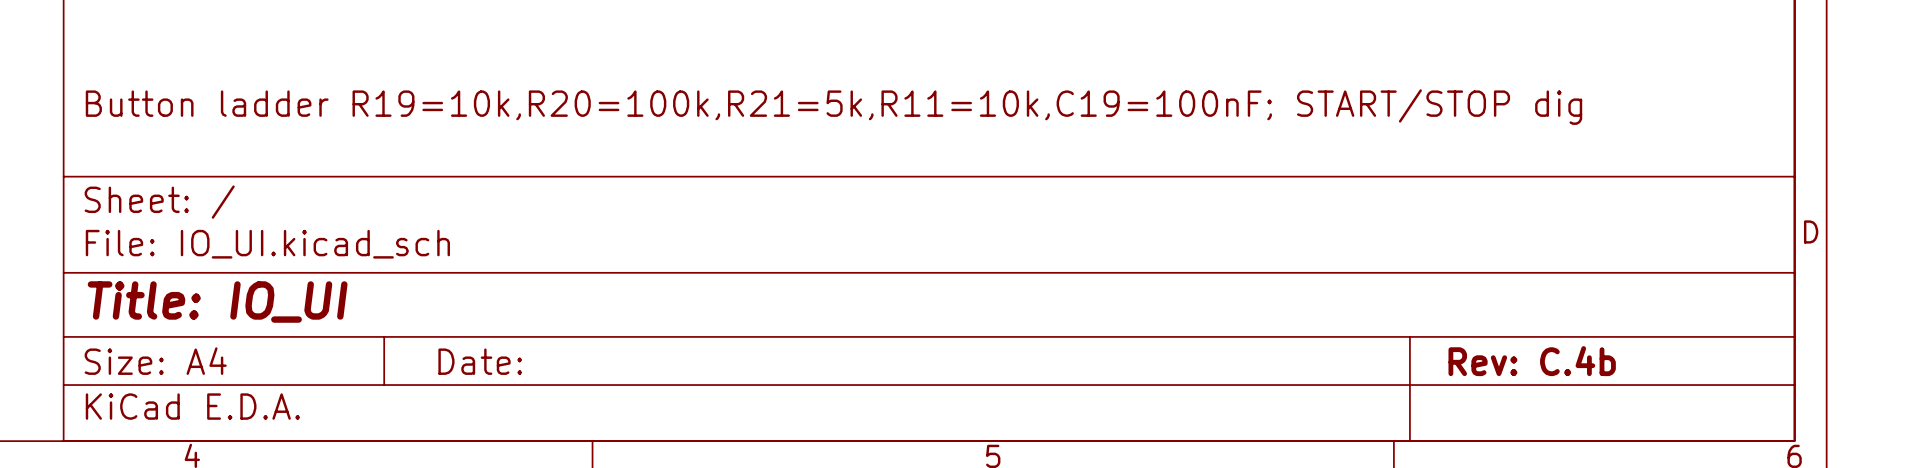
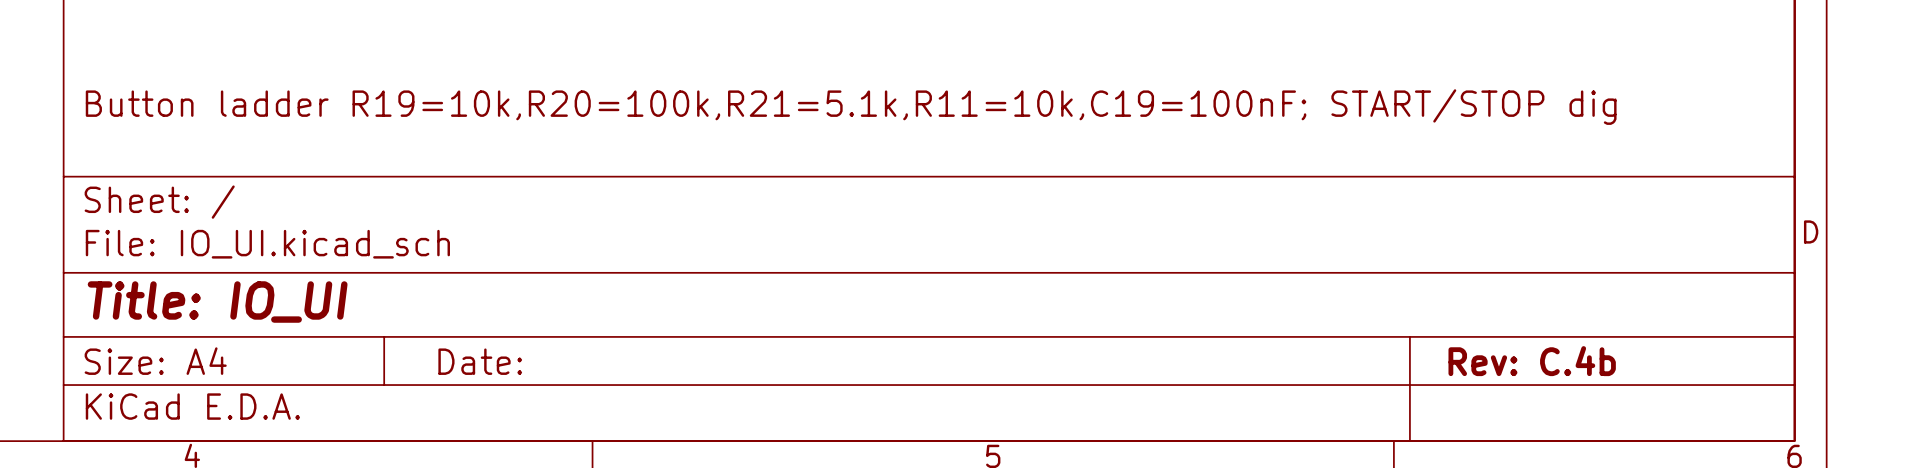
title block: Button ladder R19=10k,R20=100k,R21=5k,R11=10k,C19=100nF; START/STOP dig (833, 107) -> Button ladder R19=10k,R20=100k,R21=5.1k,R11=10k,C19=100nF; START/STOP dig (851, 107)

